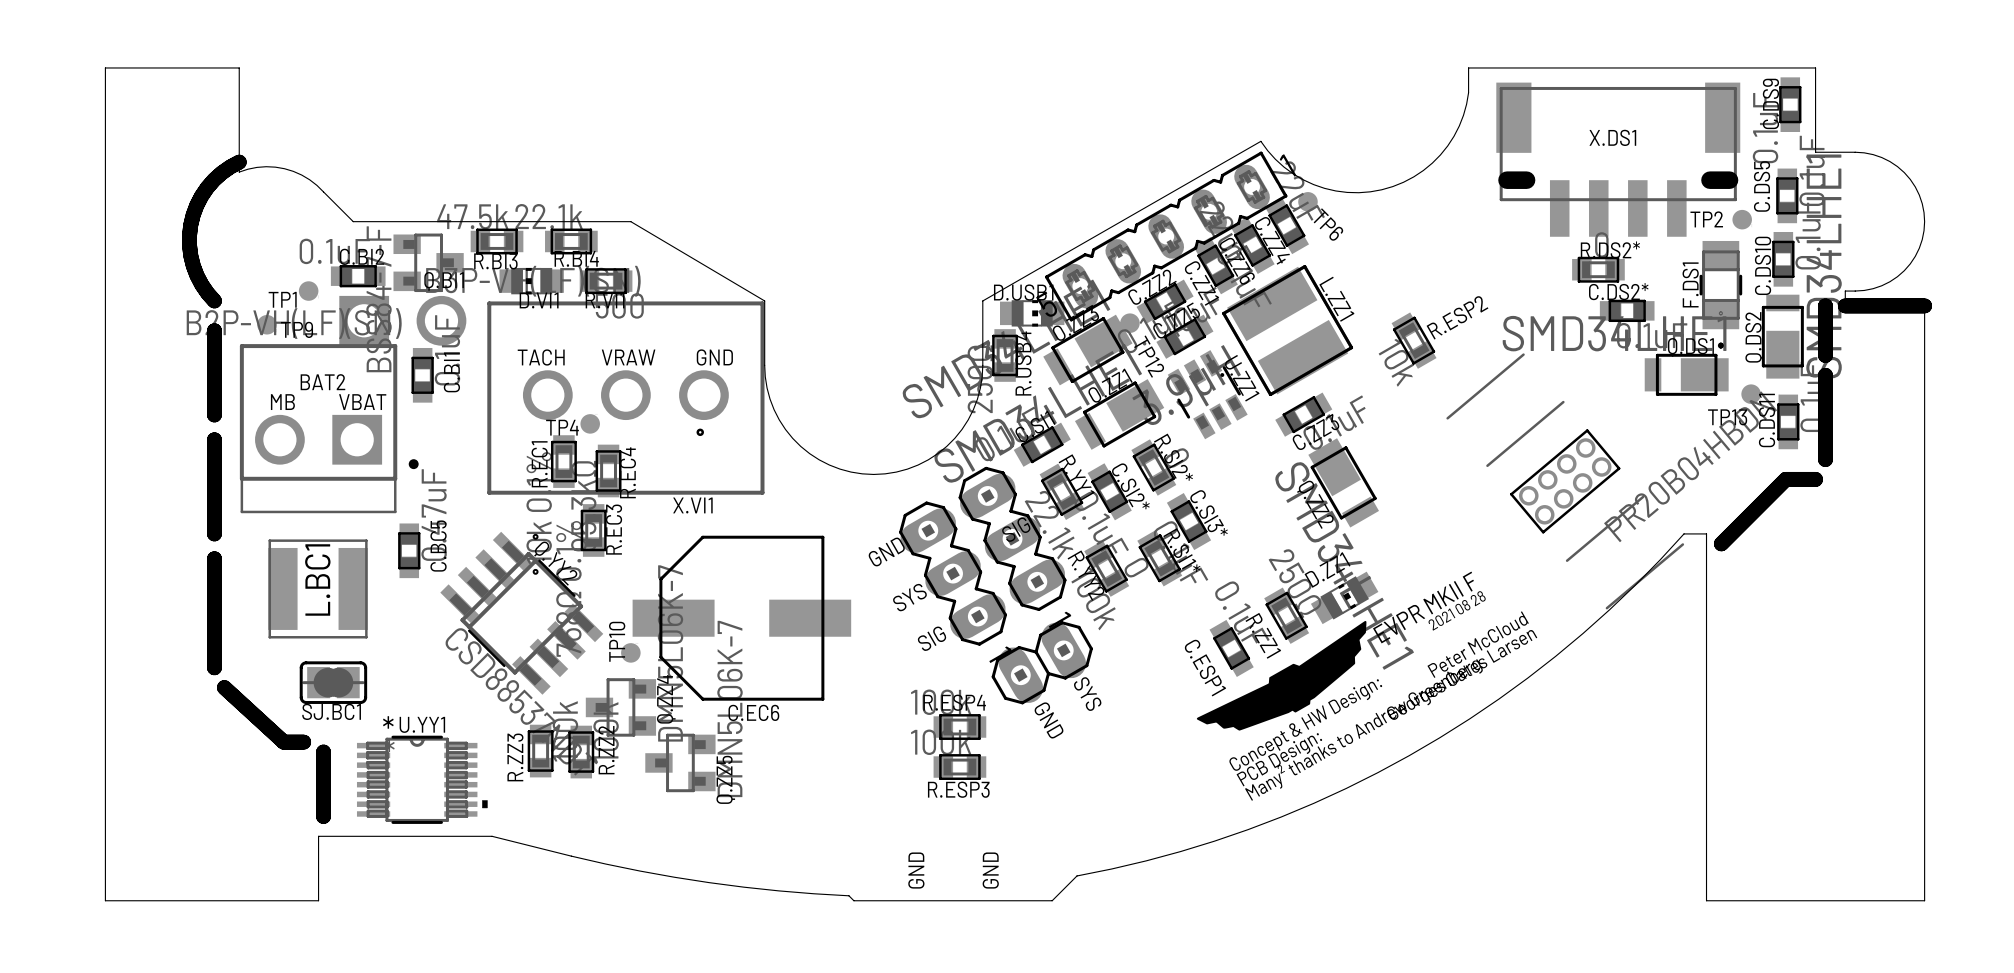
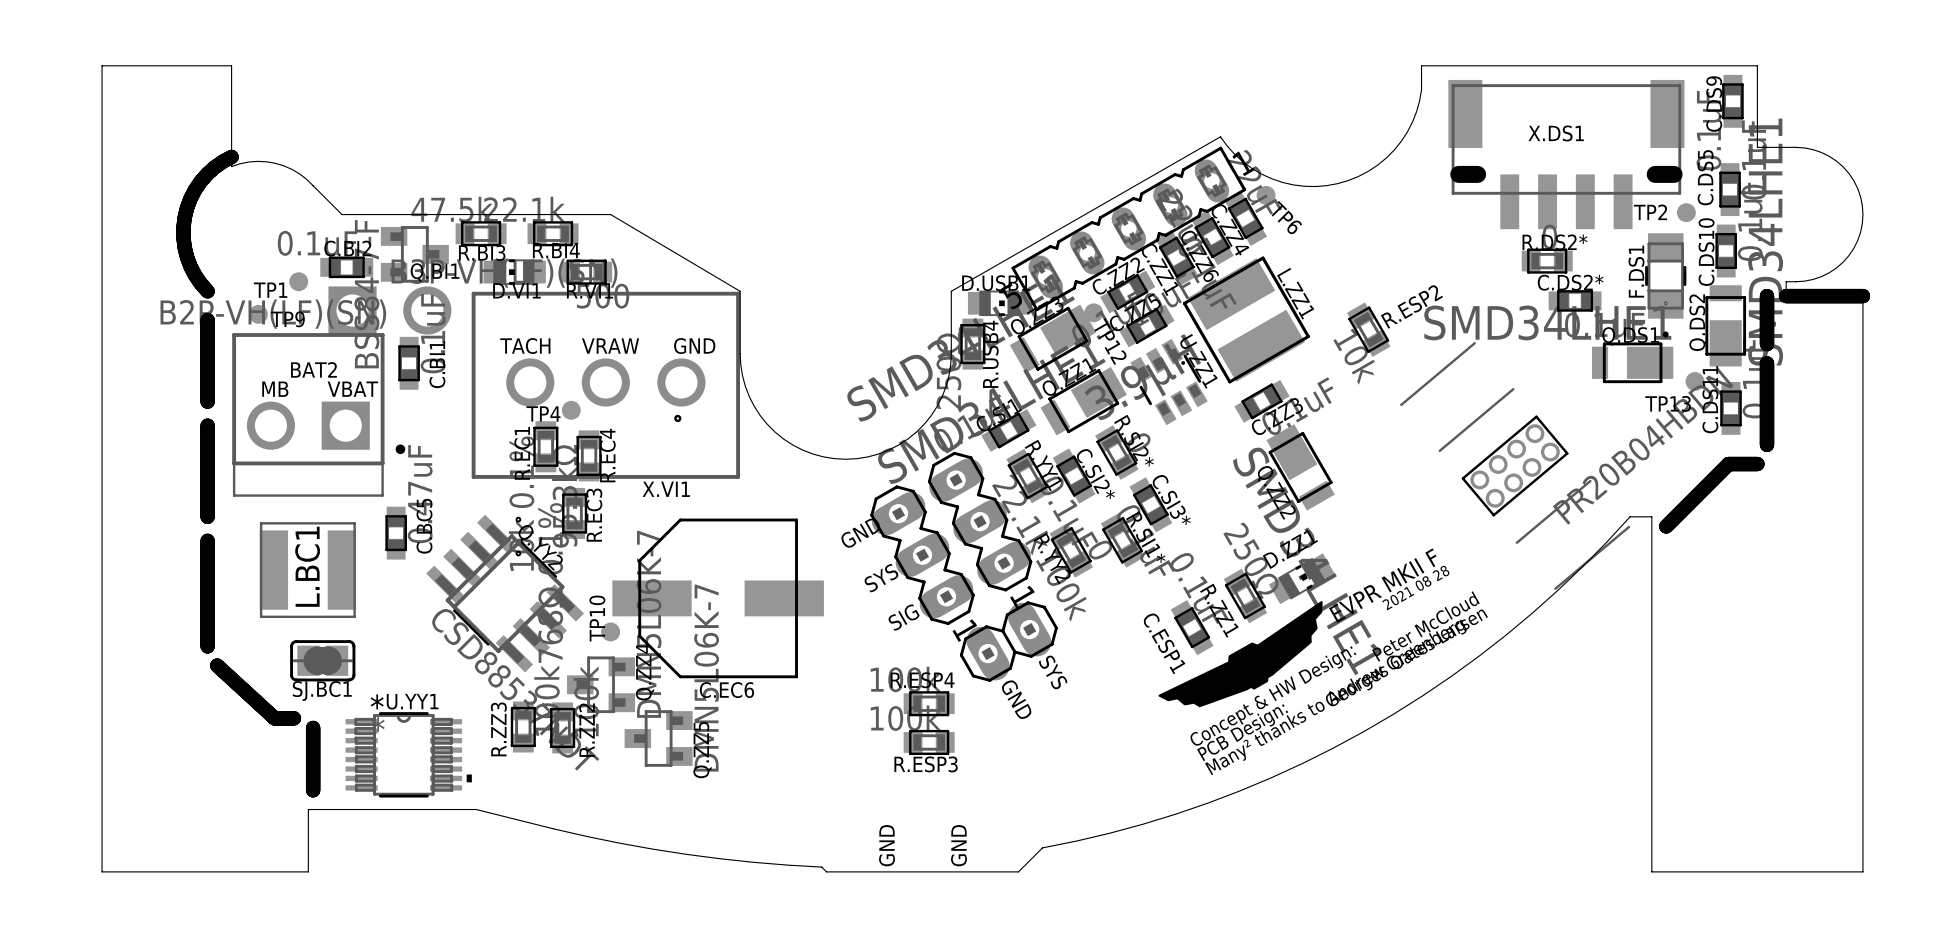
text: SIG (1016, 529) -> none

